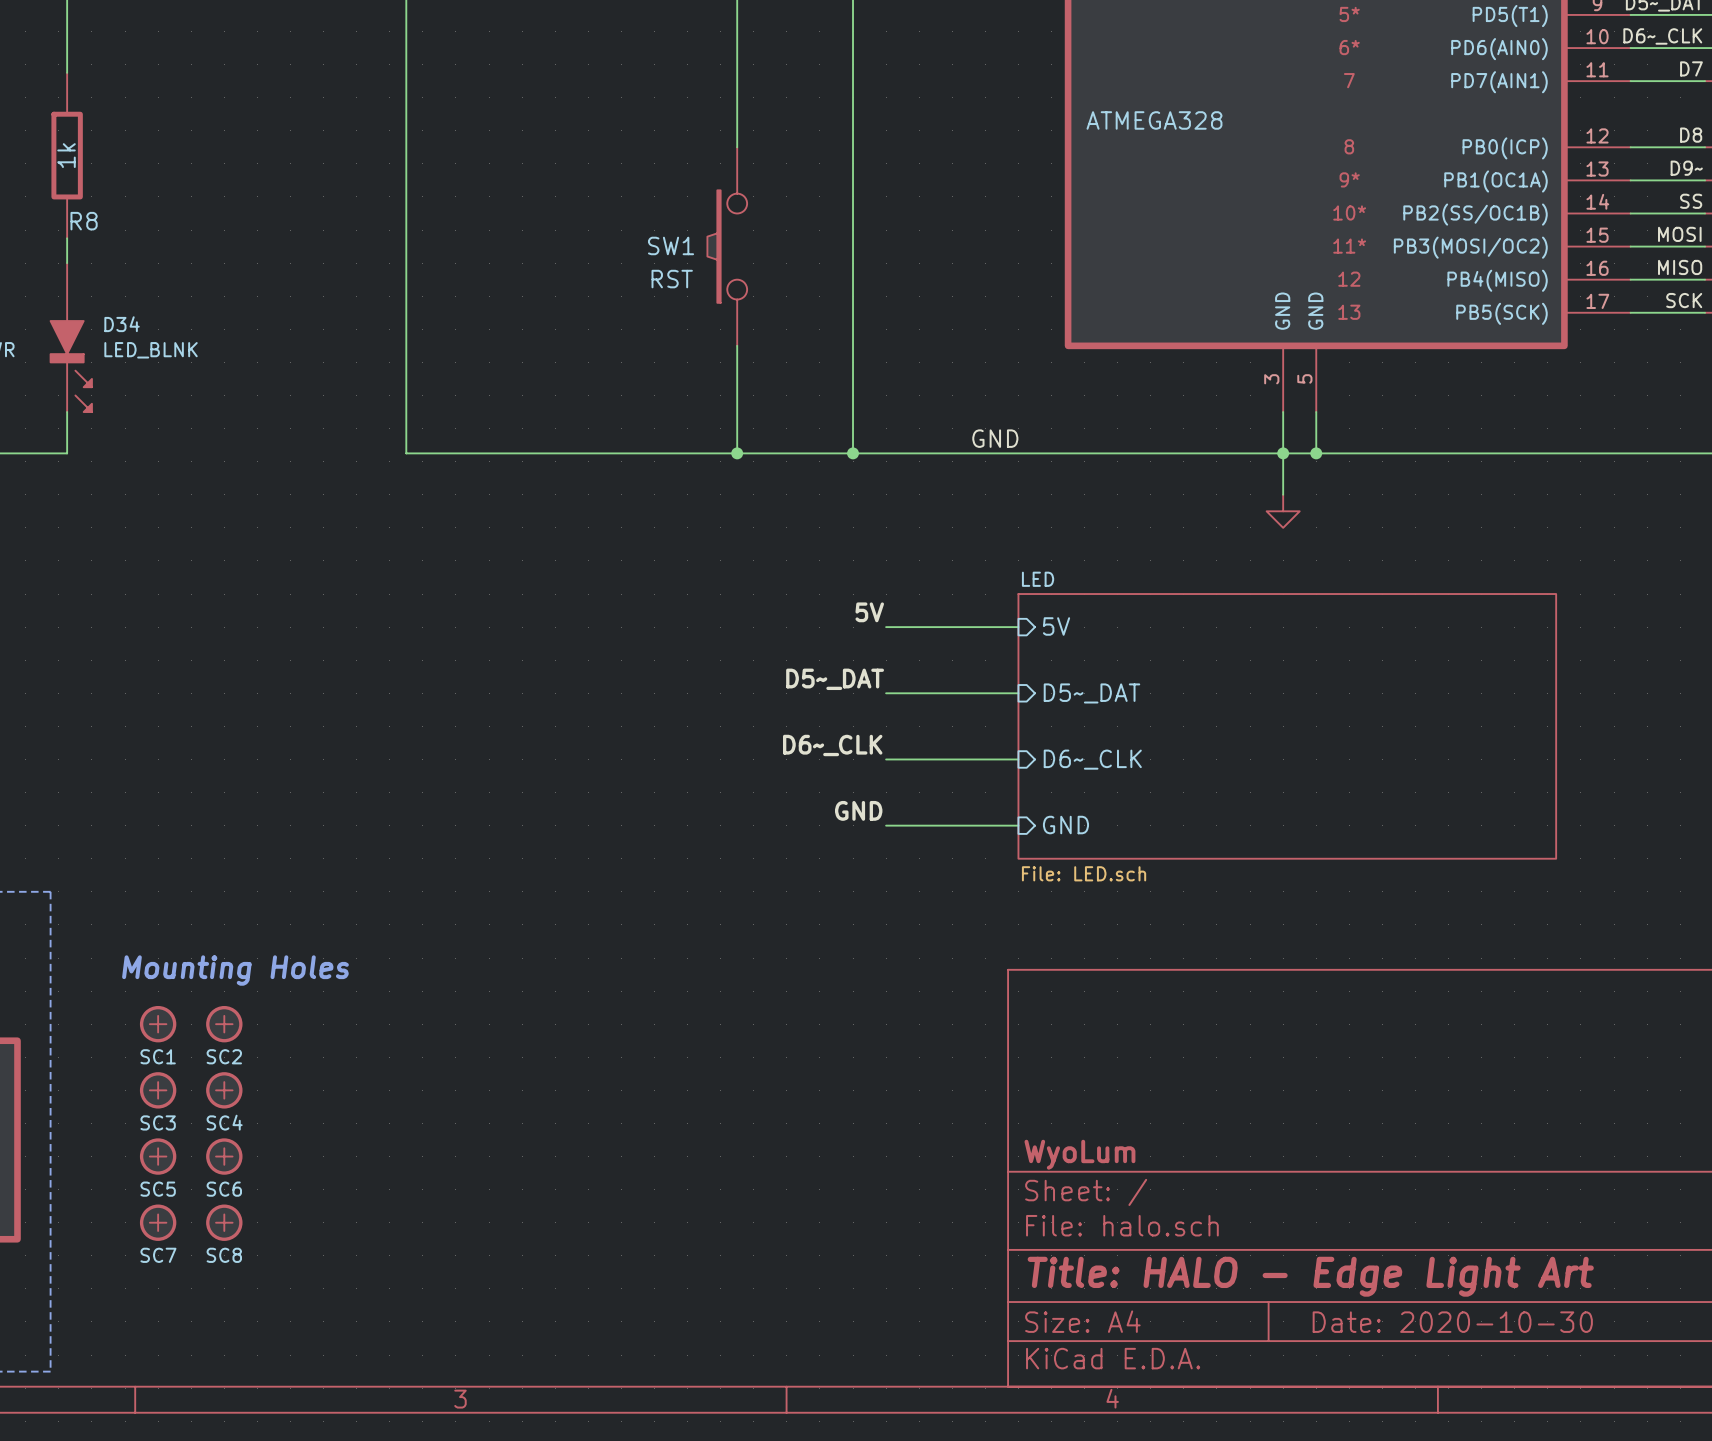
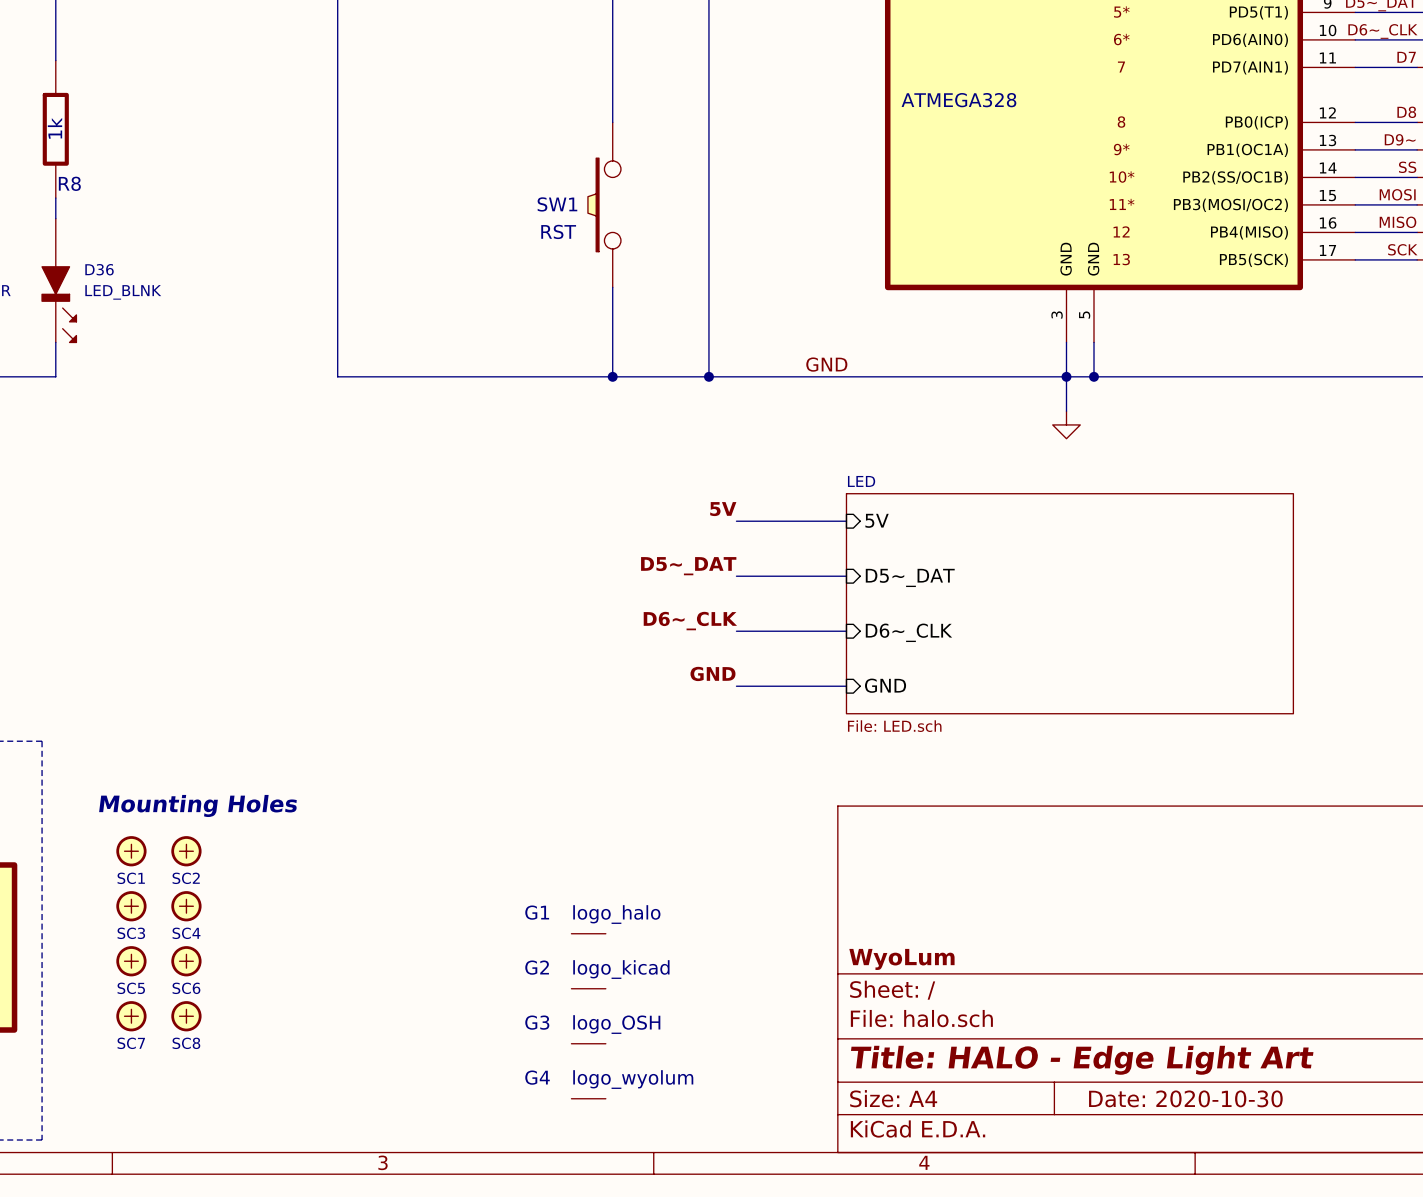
D34 name: D34 (122, 324) -> D36 (99, 269)
G1: none -> logo_halo (588, 933)
G2: none -> logo_kicad (588, 988)
G3: none -> logo_OSH (588, 1043)
G4: none -> logo_wyolum (588, 1098)

